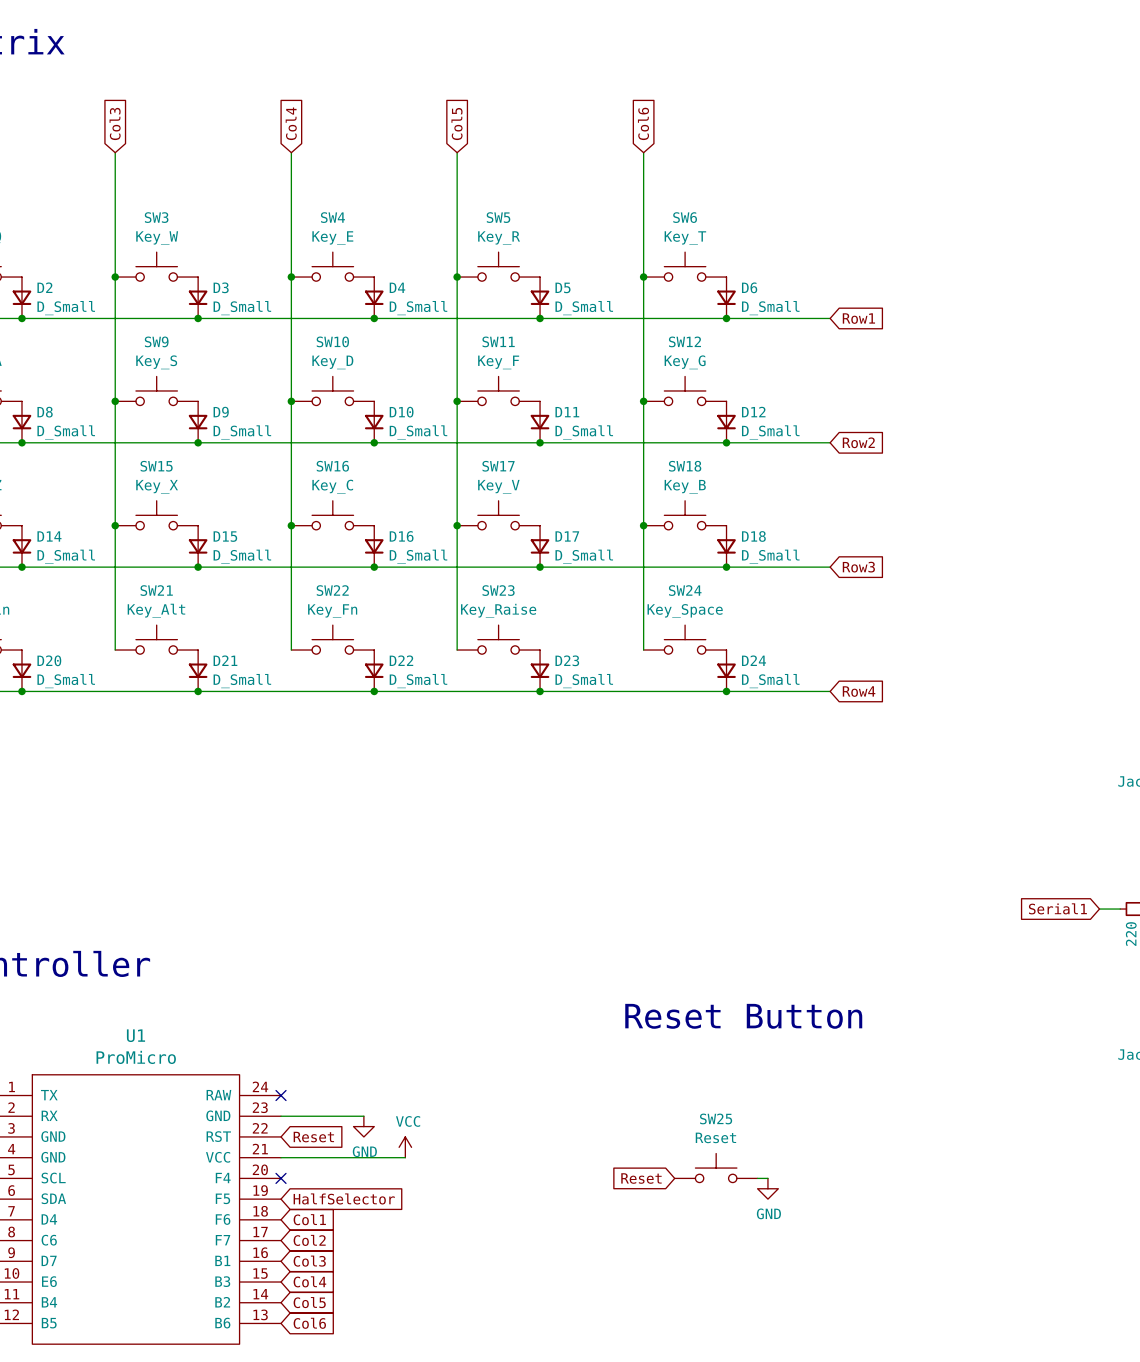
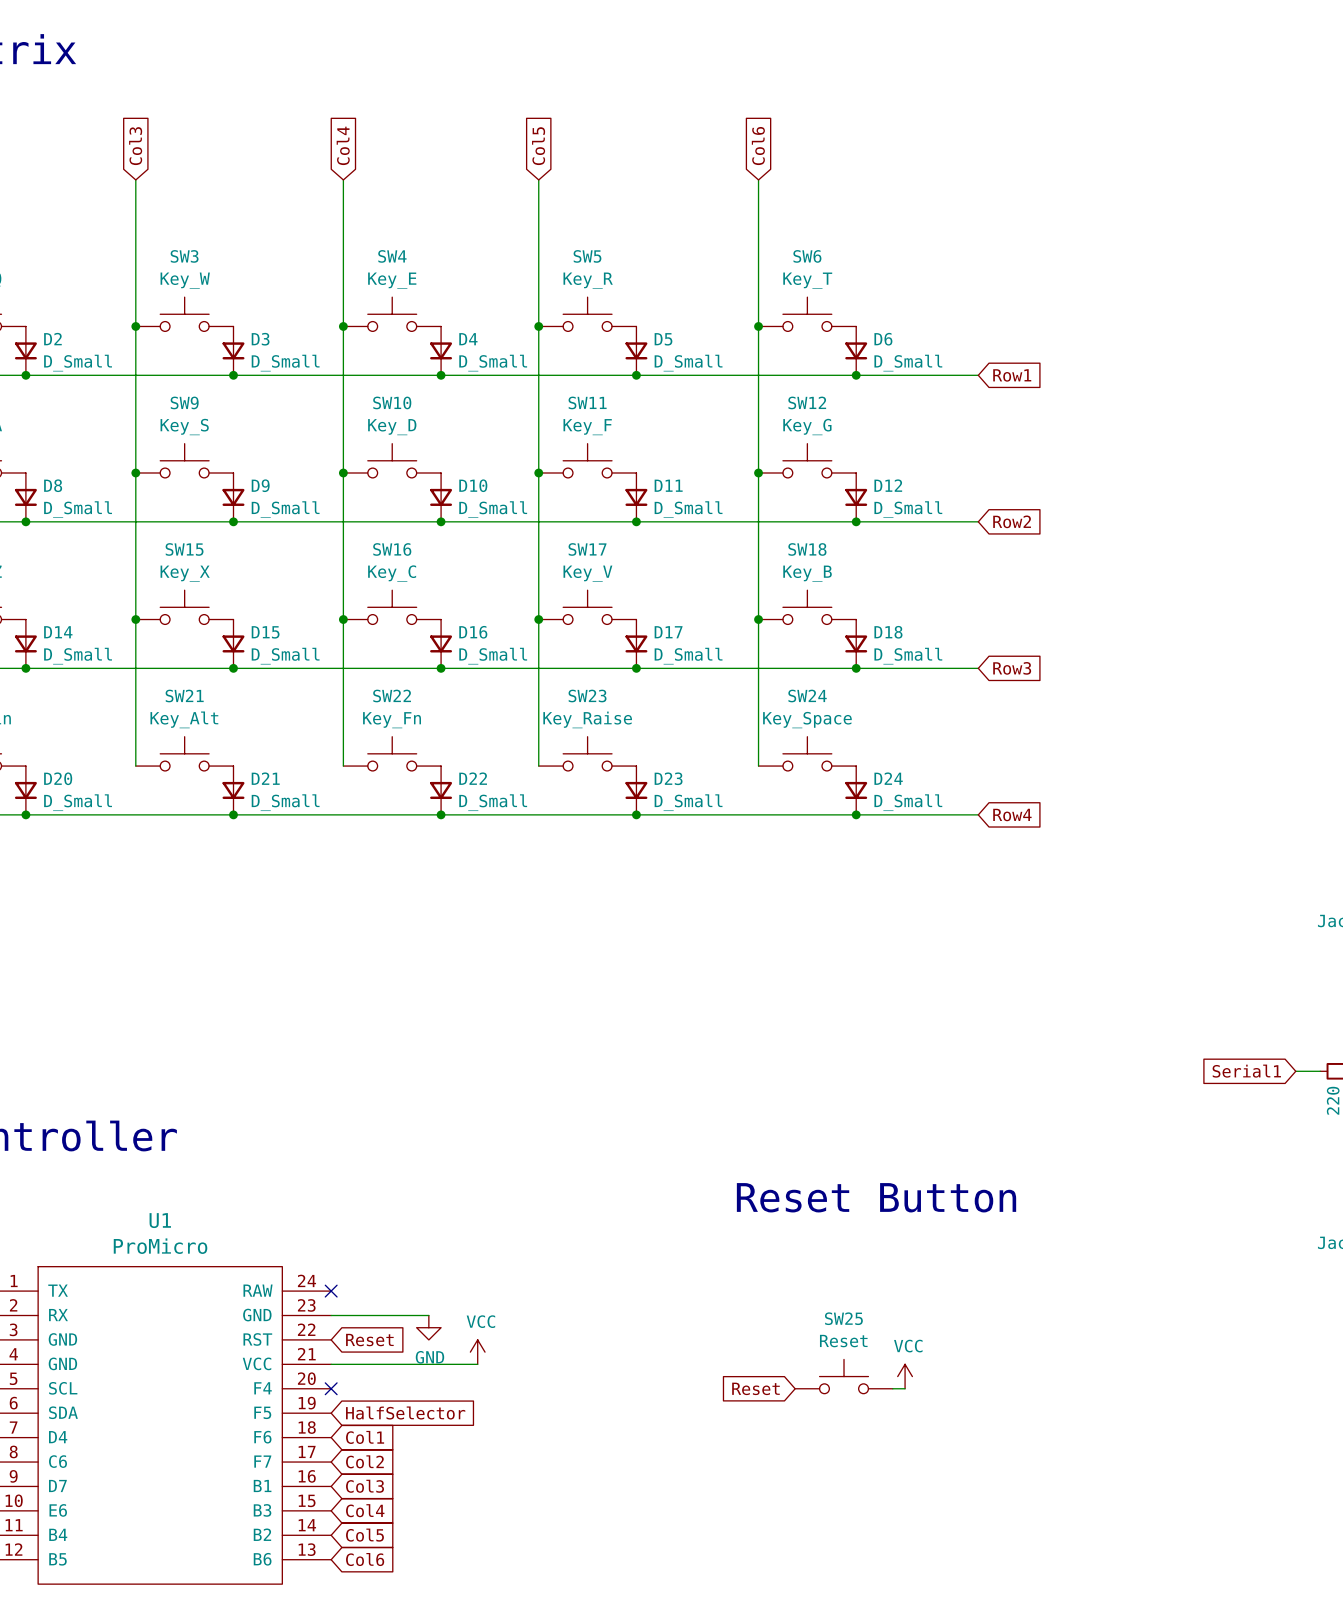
power symbol: none -> VCC (905, 1376)
power symbol: GND (767, 1188) -> none

